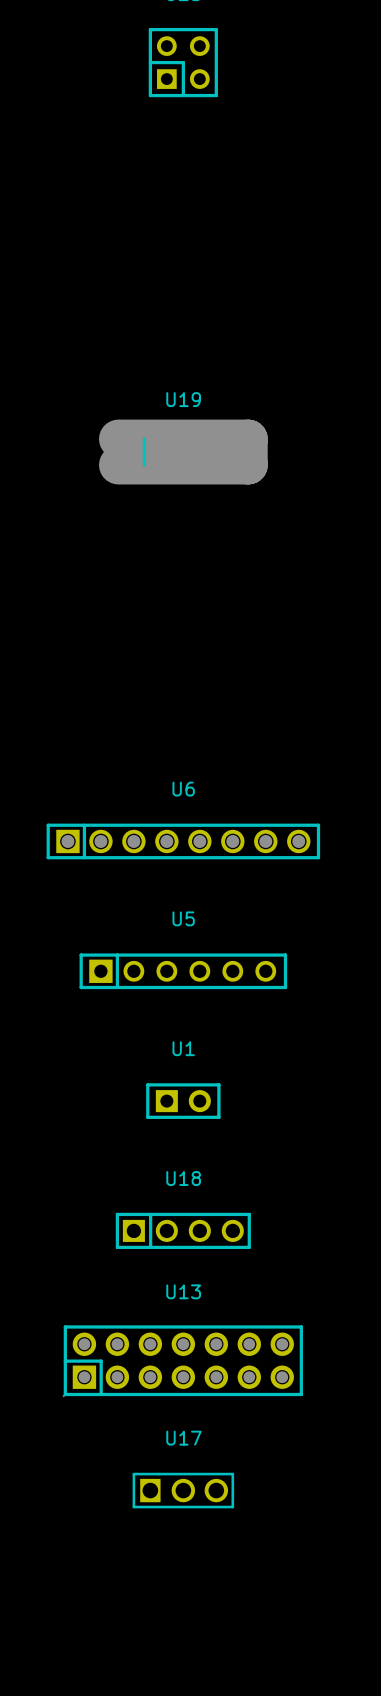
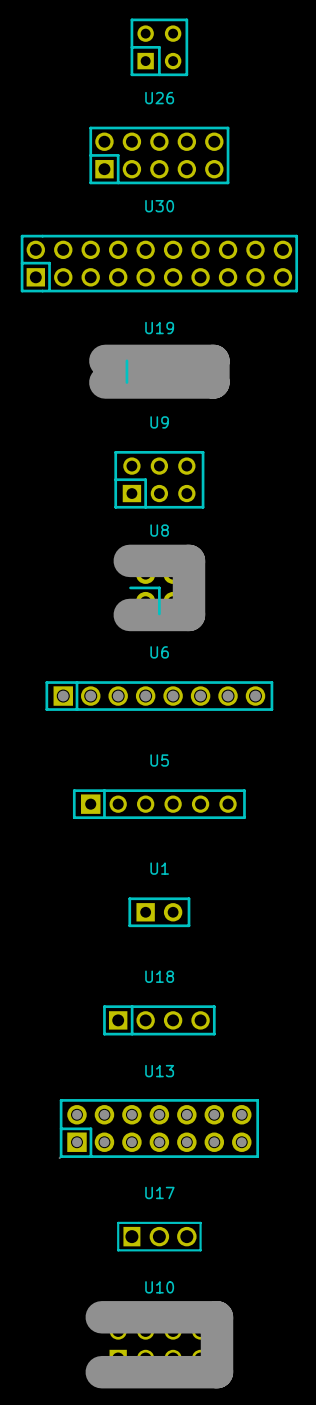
U26: none -> (159, 155)
U30: none -> (159, 263)
U9: none -> (159, 479)
U8: none -> (159, 587)
U10: none -> (159, 1344)

